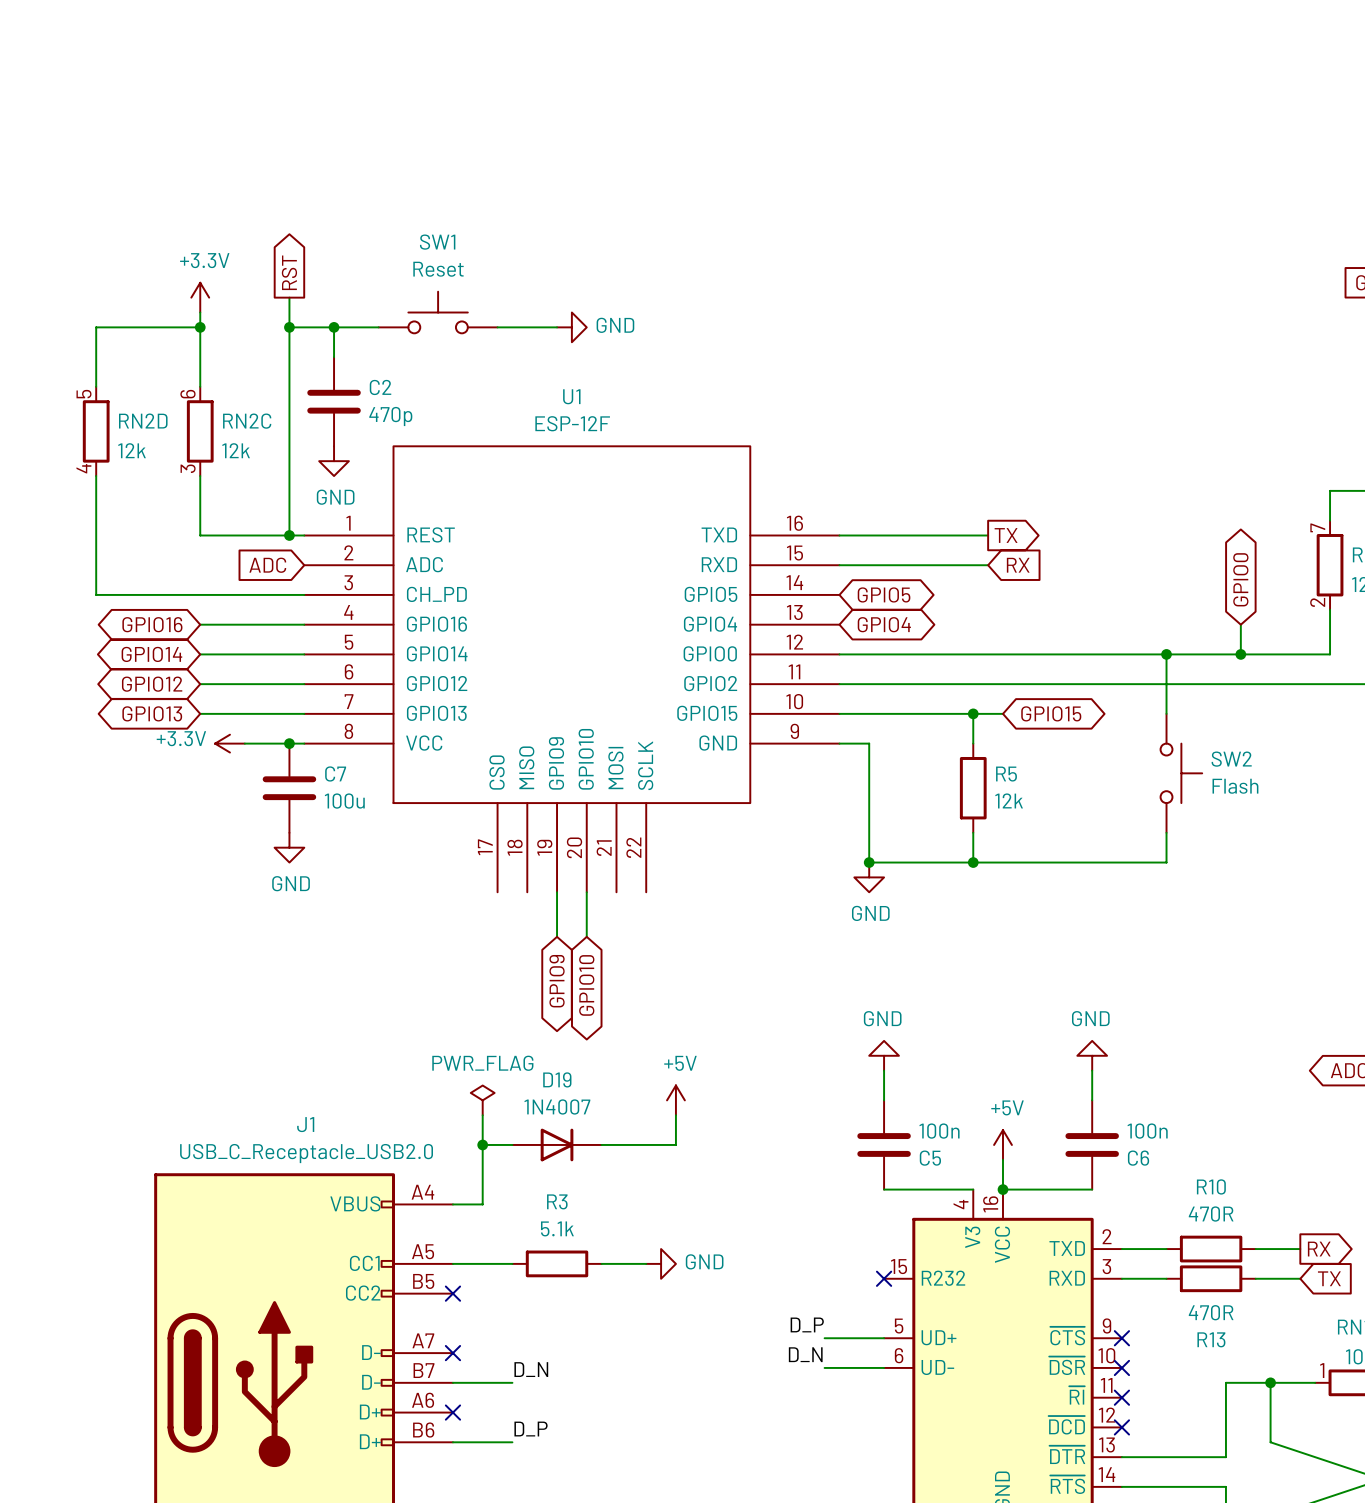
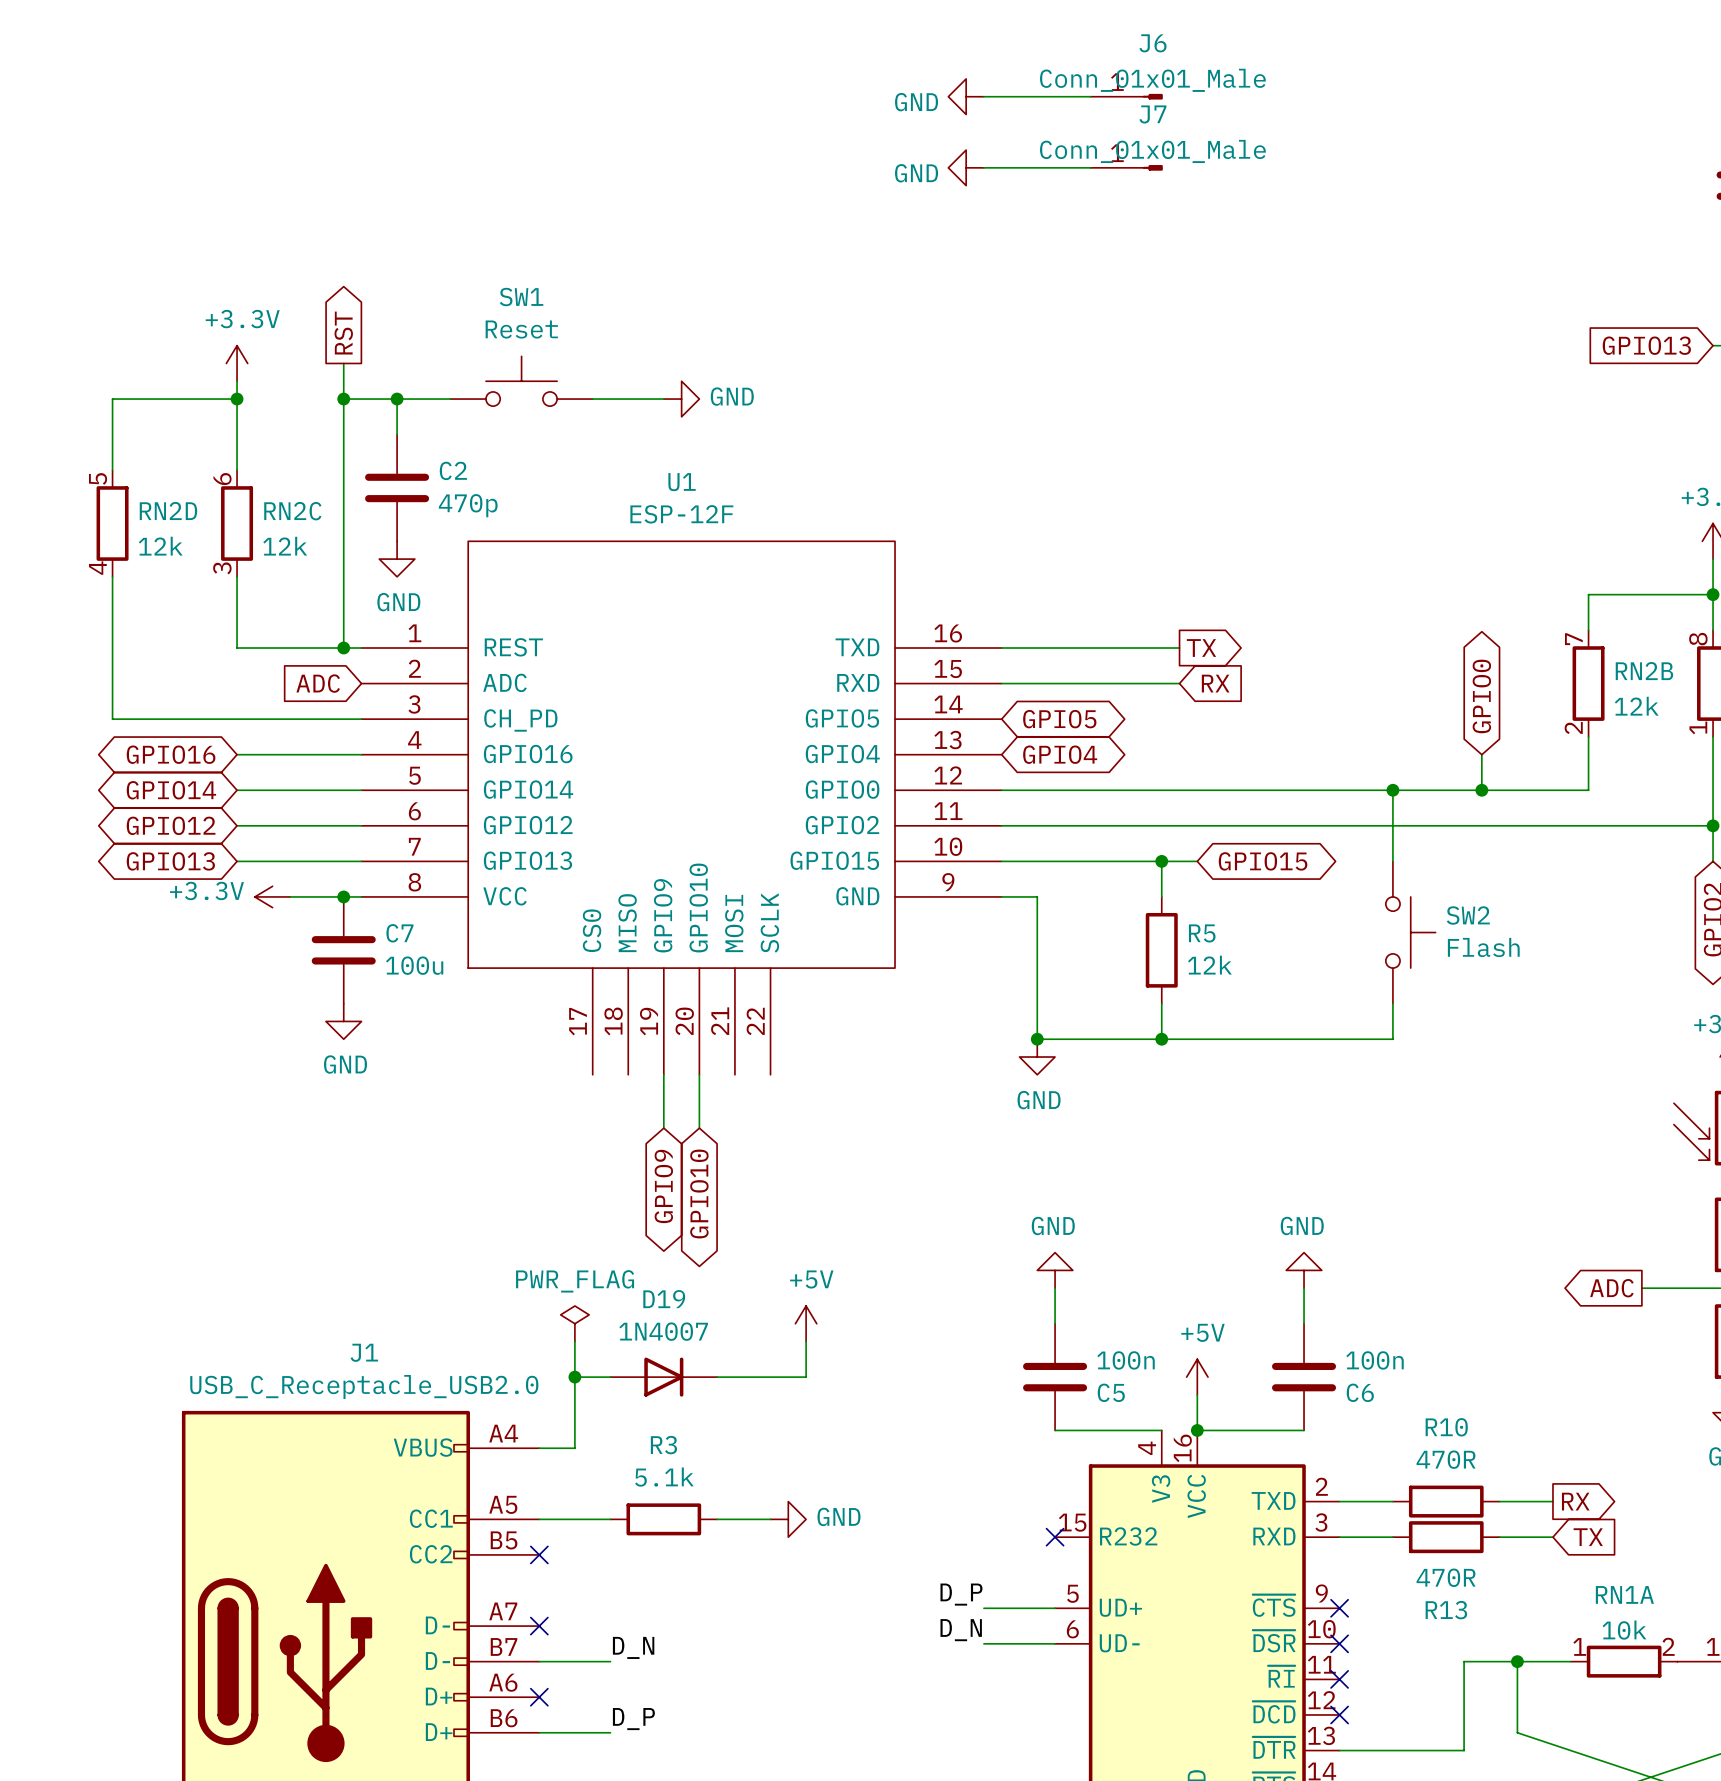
power symbol: none -> GND (966, 96)
wire: none -> (983, 96) (1090, 96)
J6: none -> Conn_01x01_Male (1126, 96)
power symbol: none -> GND (966, 167)
wire: none -> (983, 167) (1090, 167)
J7: none -> Conn_01x01_Male (1126, 167)

